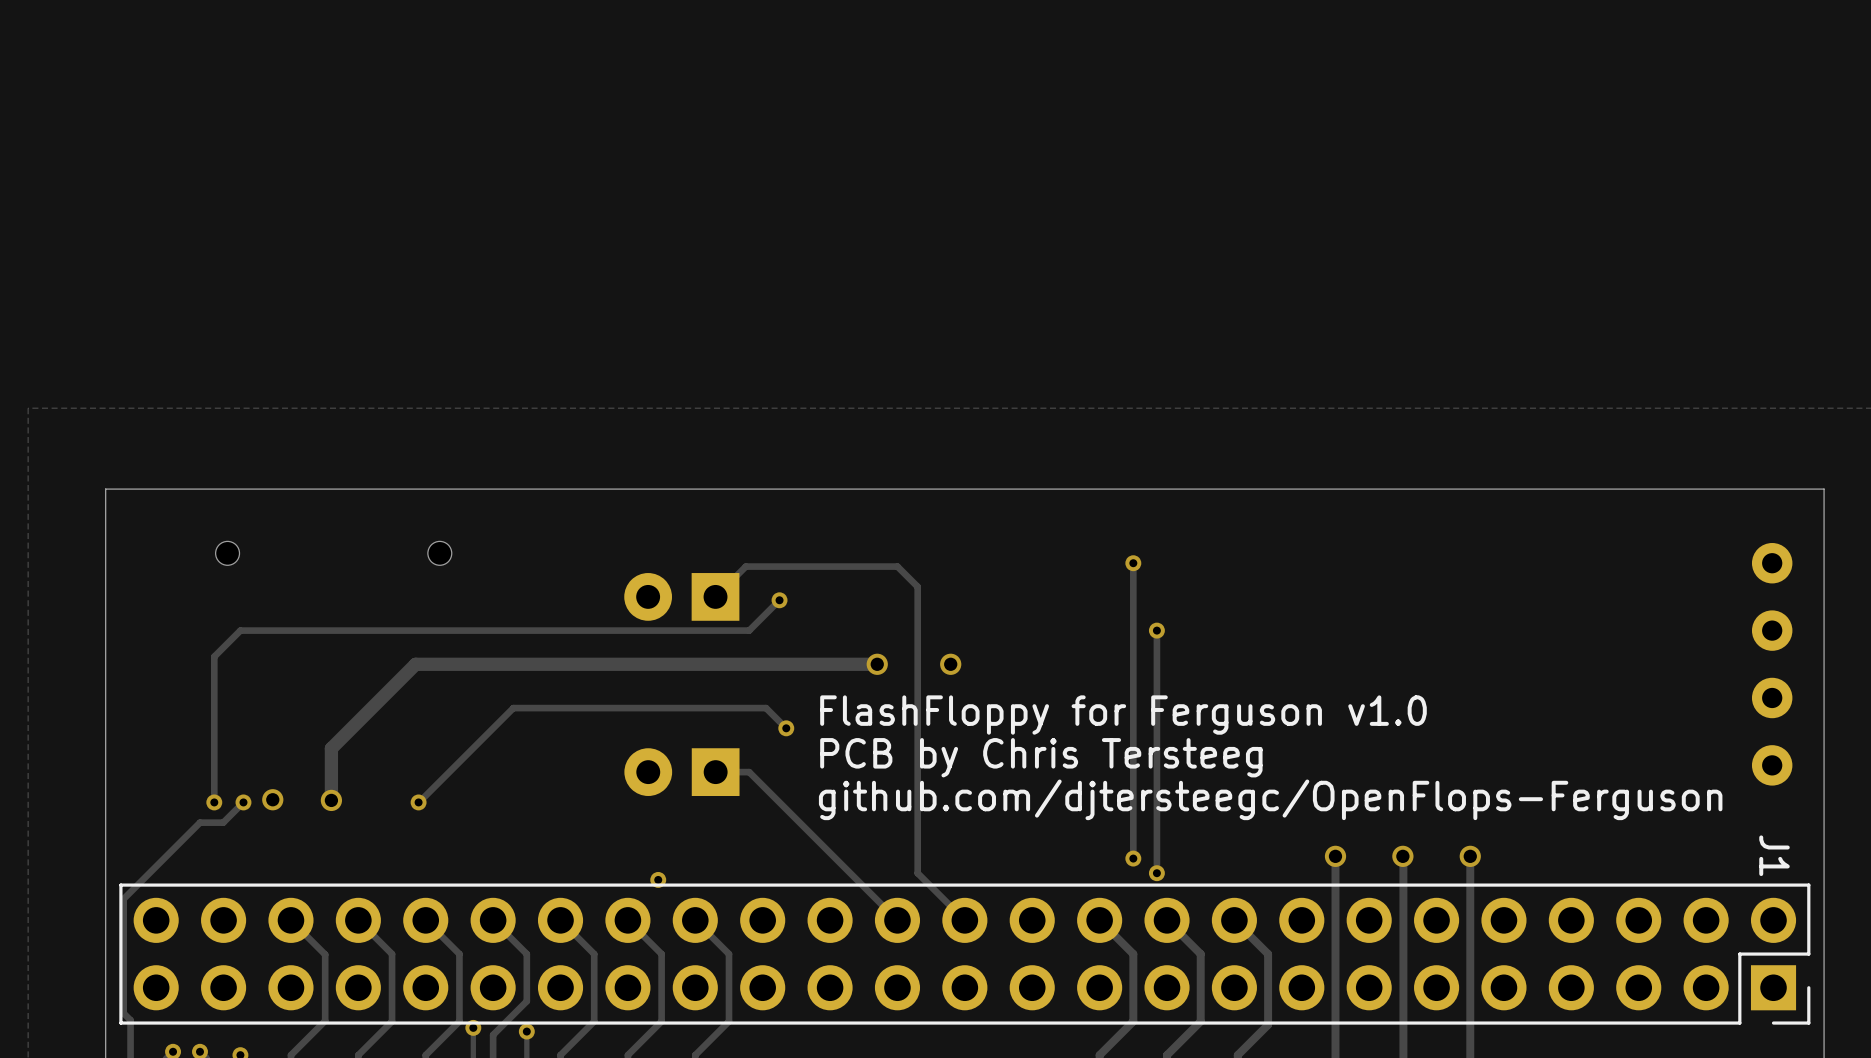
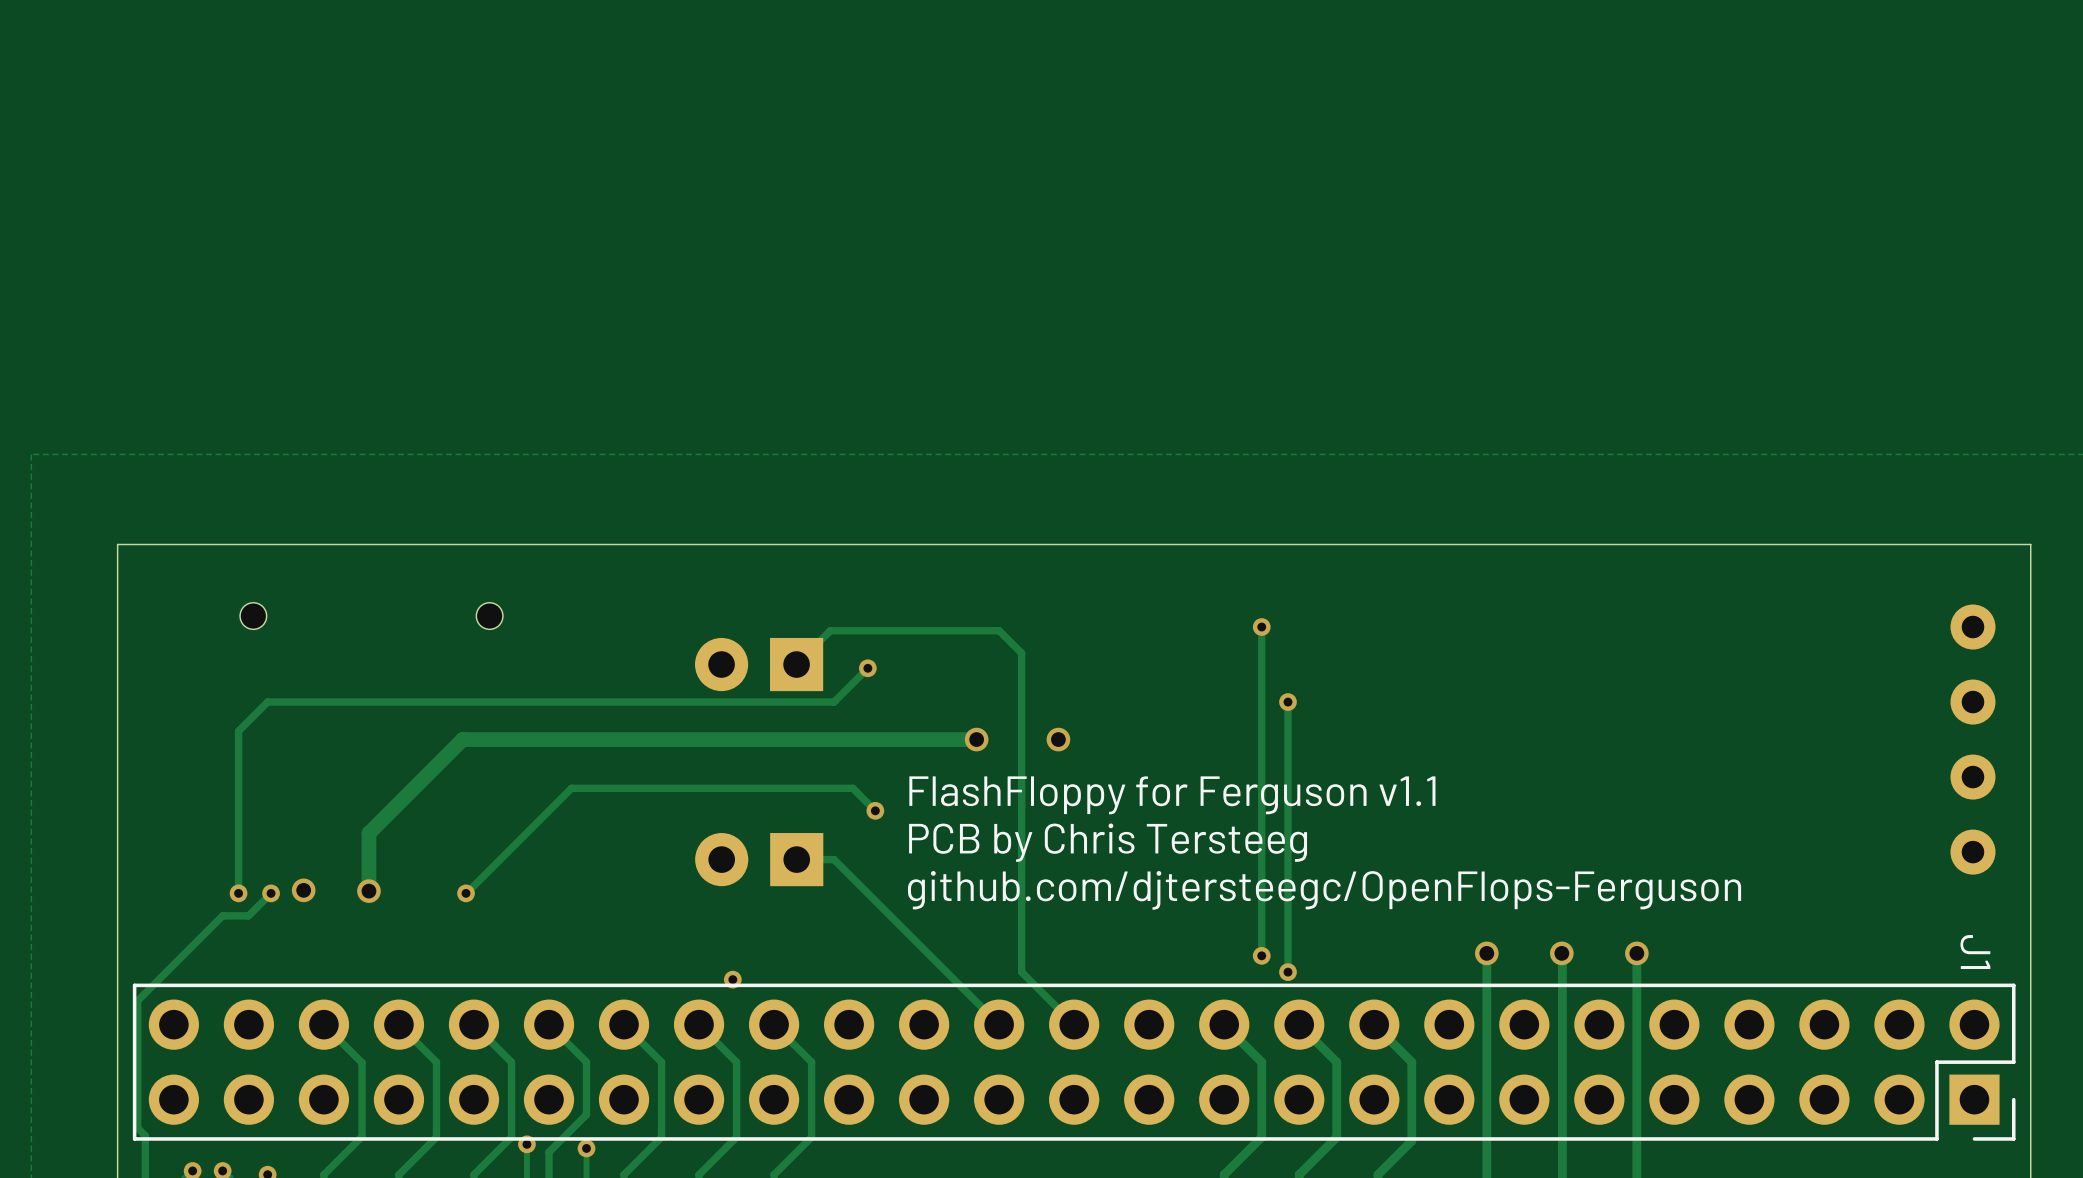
text: FlashFloppy for Ferguson v1.0 (1123, 715) -> FlashFloppy for Ferguson v1.1 (1172, 795)

